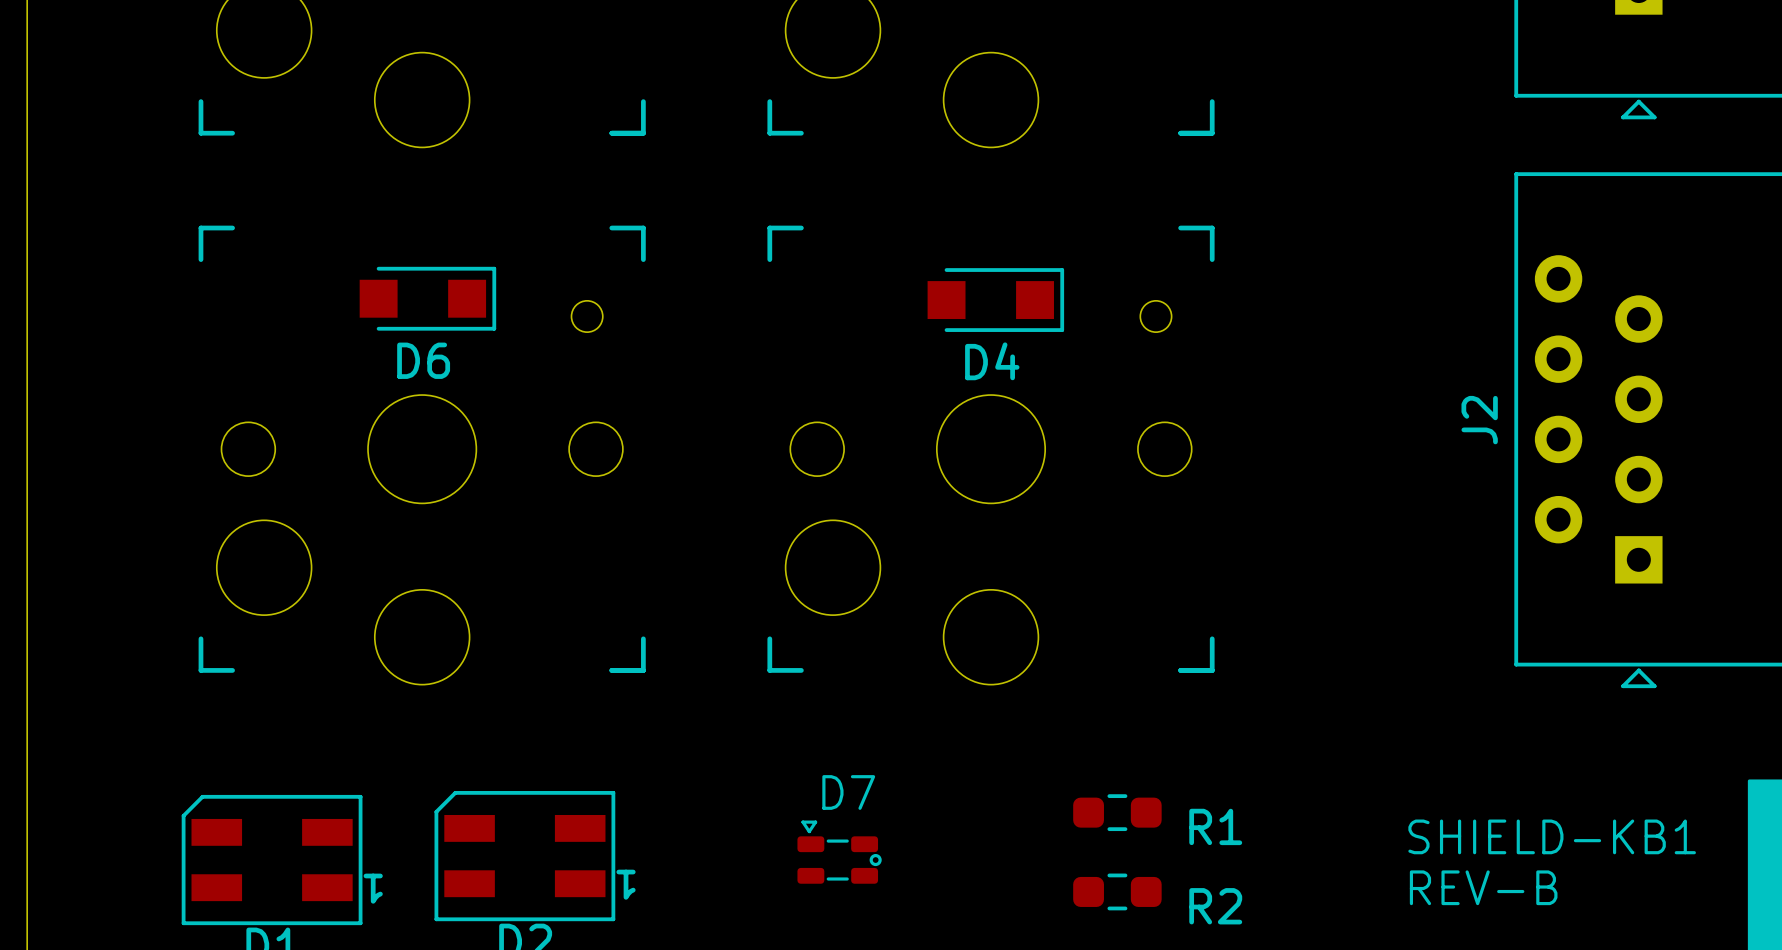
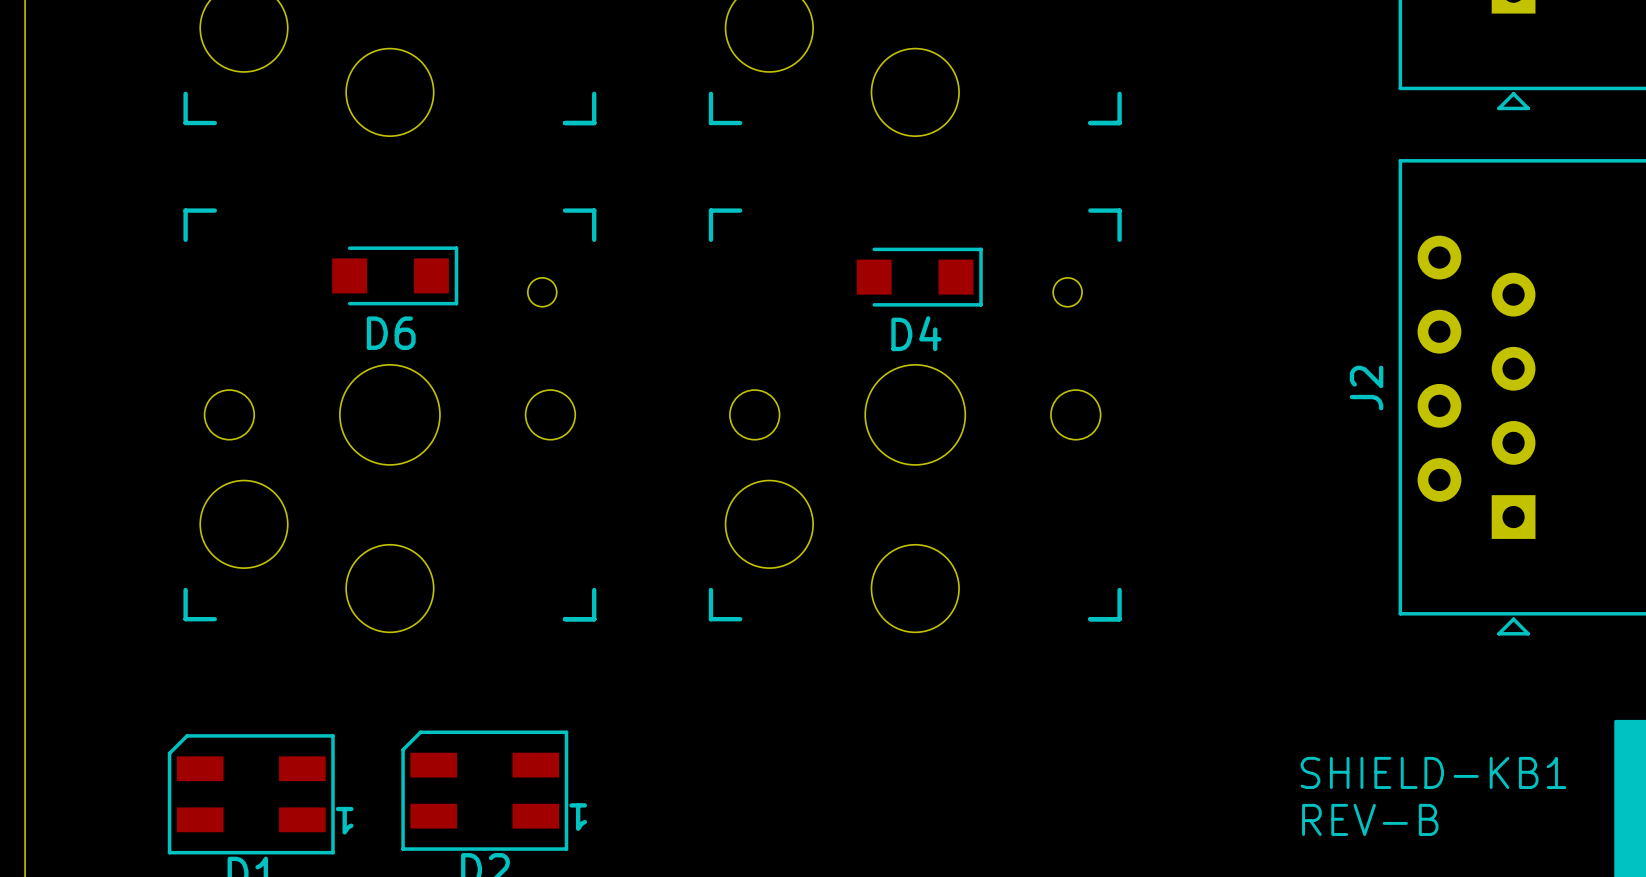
R1: (1117, 812) -> none
D7: (839, 852) -> none
R2: (1117, 891) -> none

